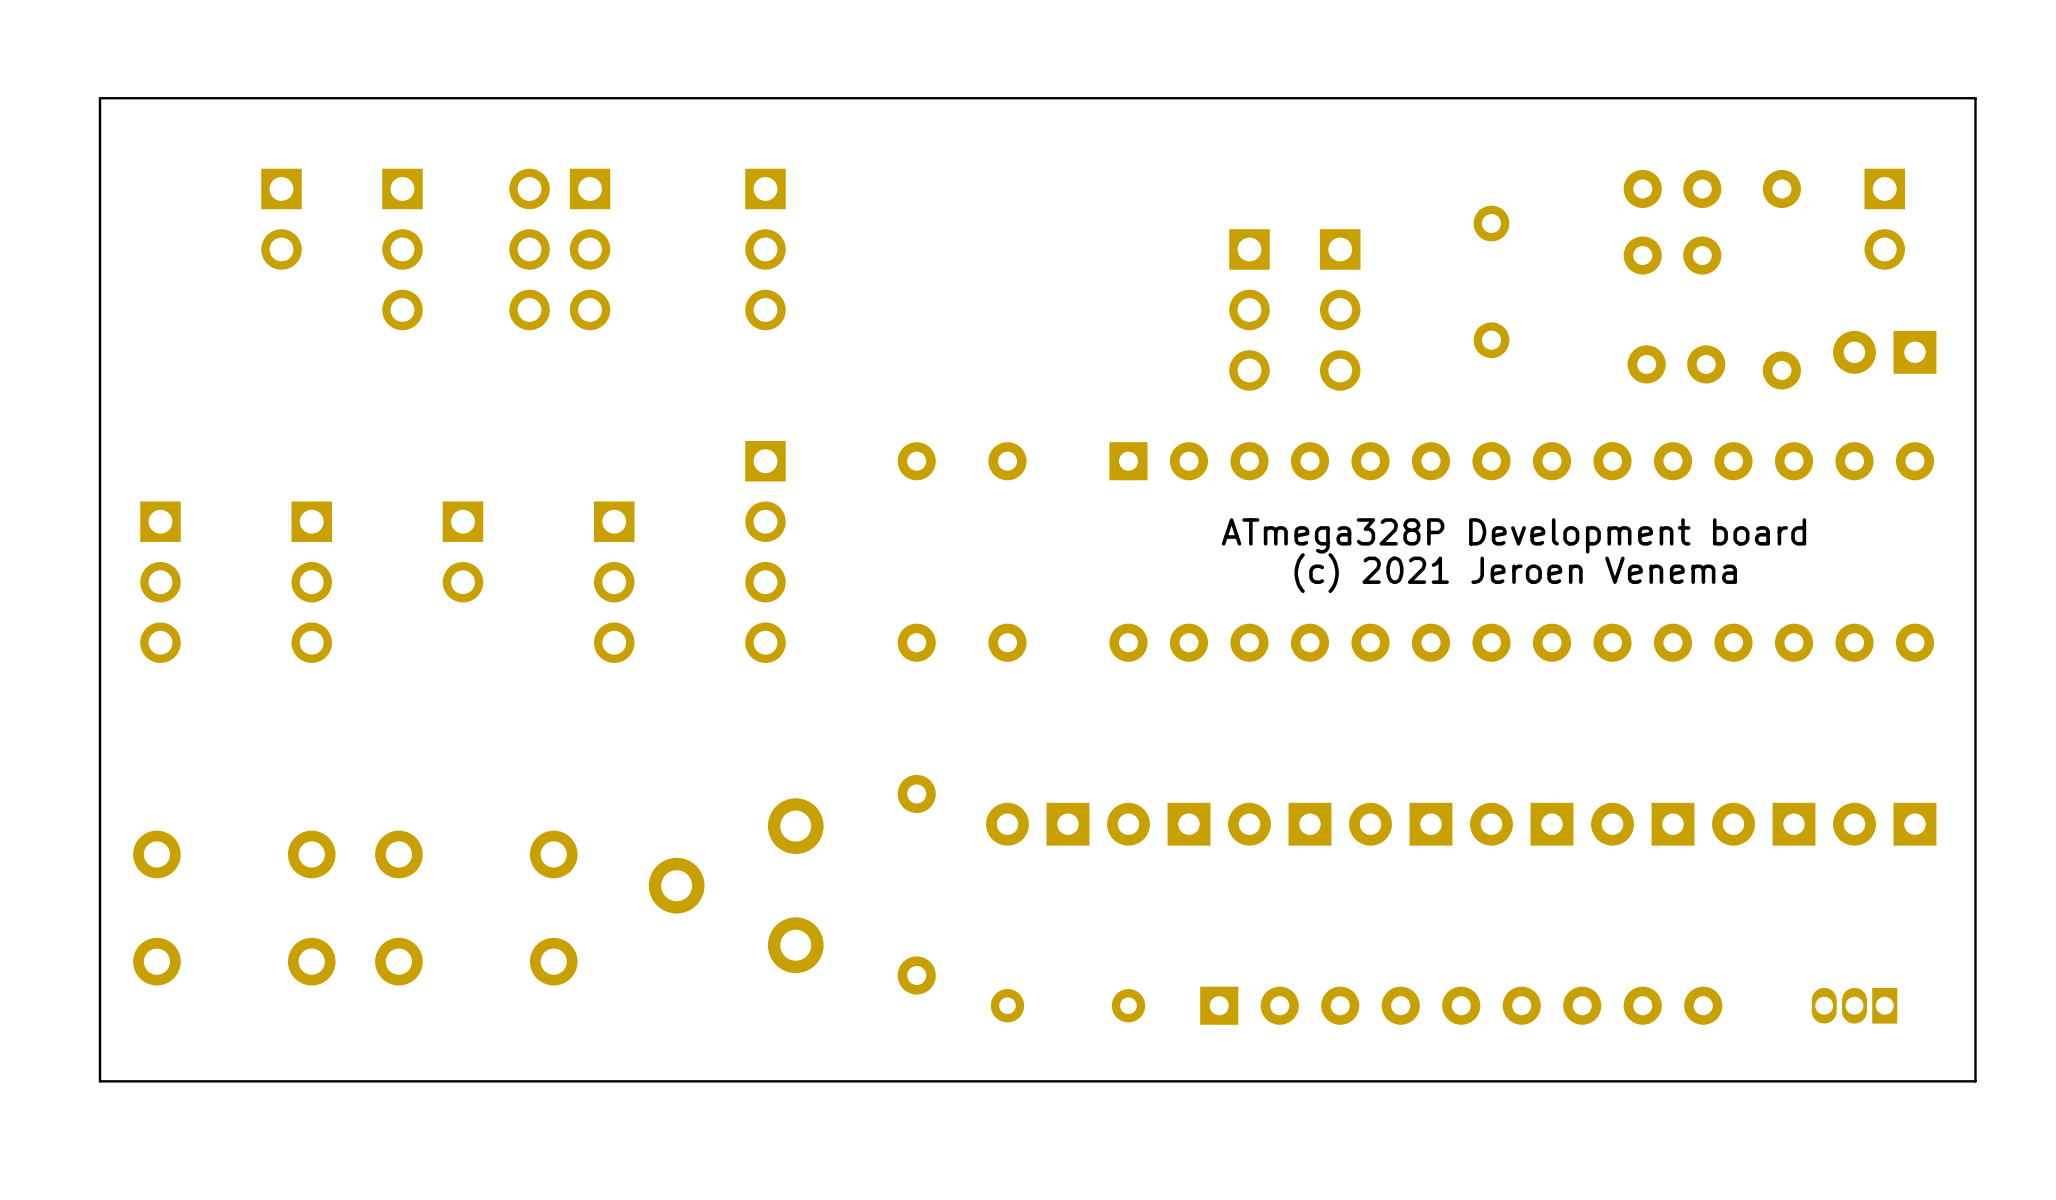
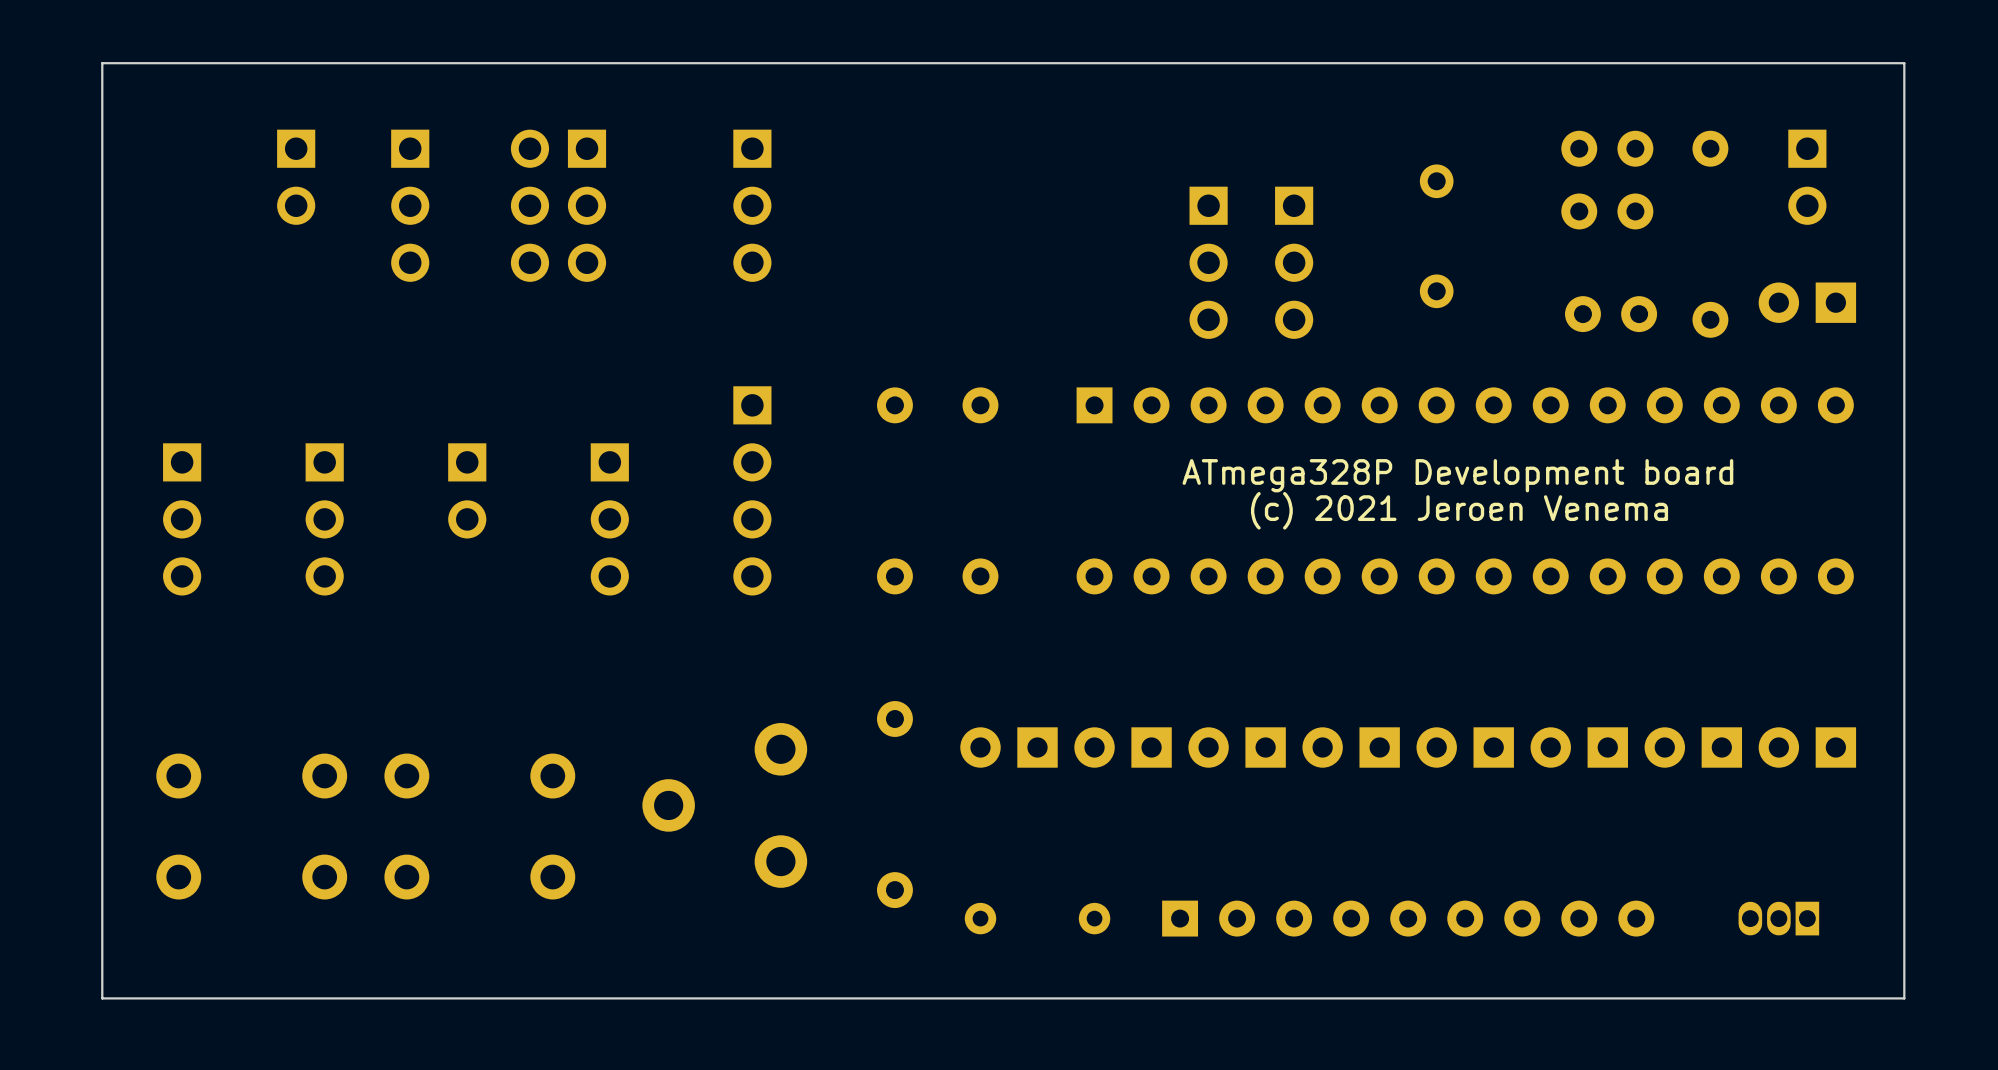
board edge: (1975, 98) (1975, 1081) (99, 1081) (99, 98) -> (1892, 63) (1904, 63) (1904, 998) (102, 998) (102, 63) (125, 63)

